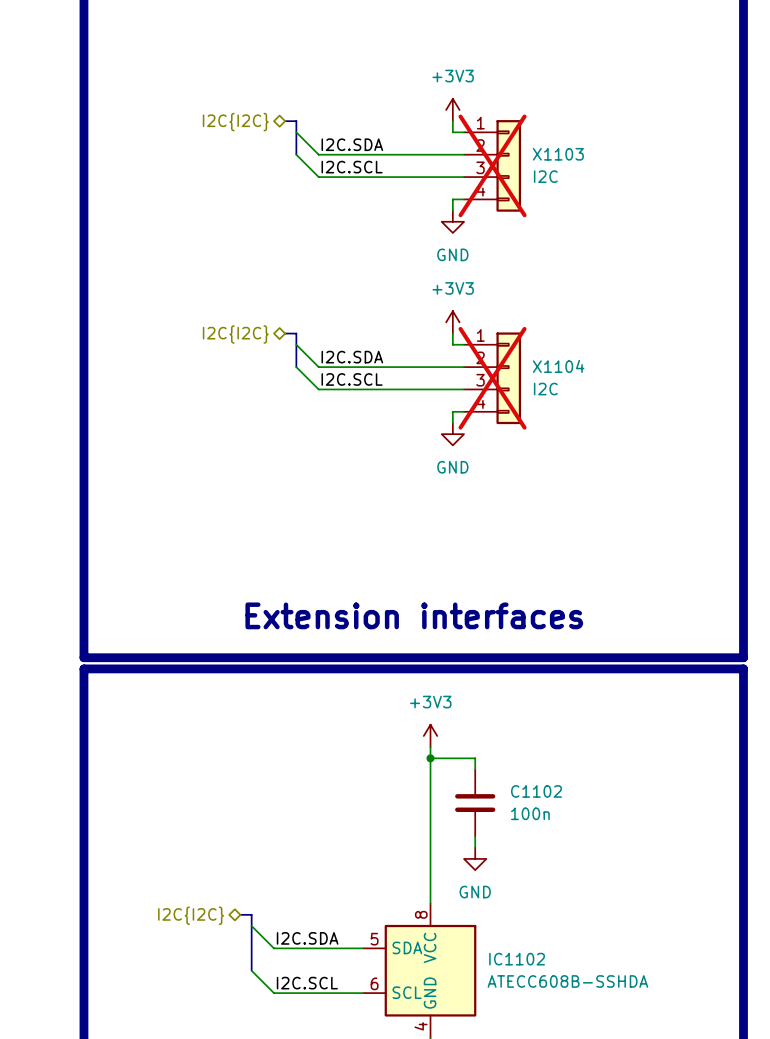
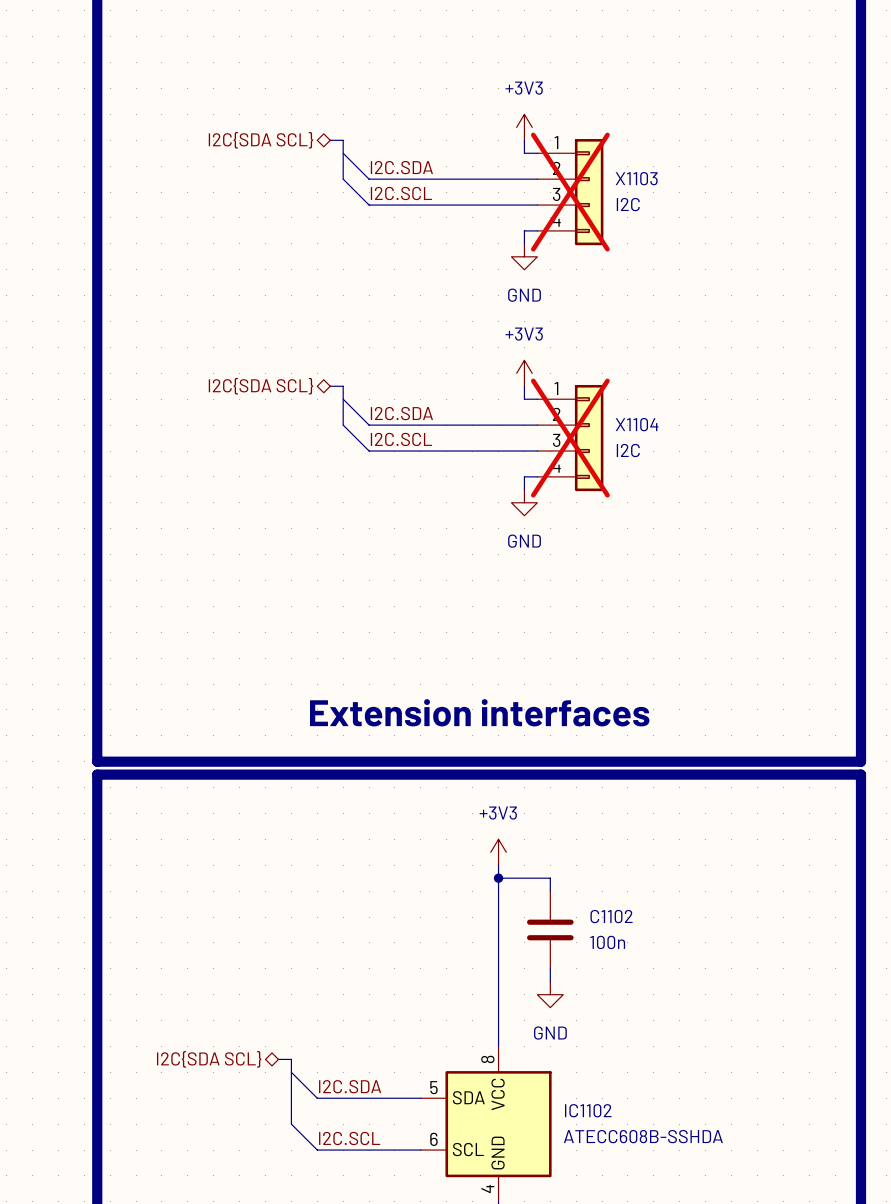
hierarchical label: I2C{I2C} (235, 122) -> I2C{SDA SCL} (260, 140)
hierarchical label: I2C{I2C} (235, 334) -> I2C{SDA SCL} (260, 386)
hierarchical label: I2C{I2C} (191, 915) -> I2C{SDA SCL} (209, 1059)

